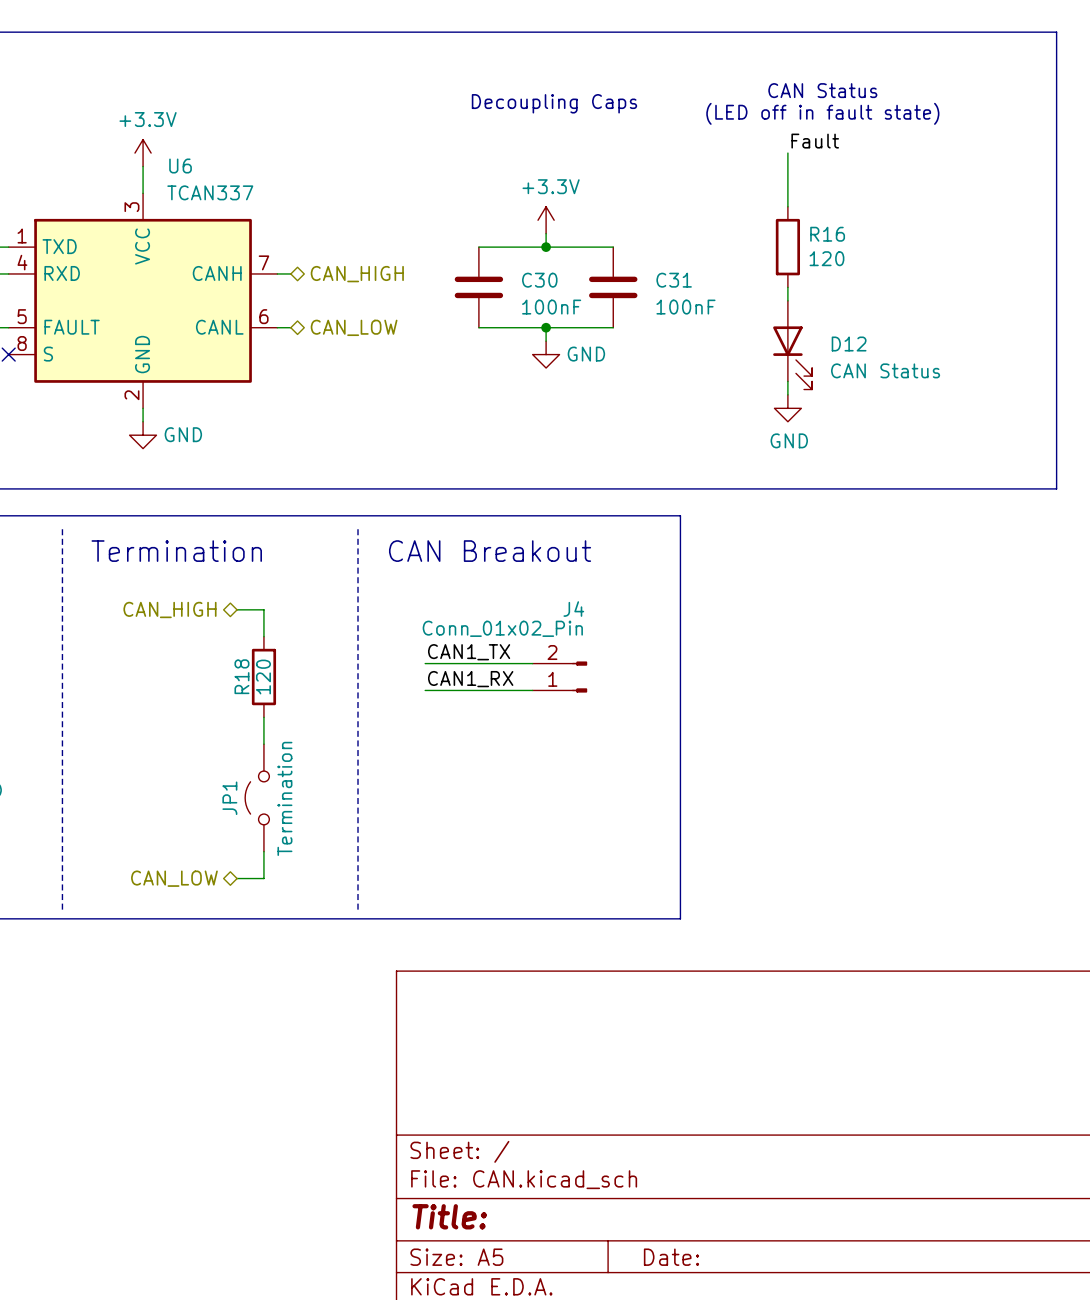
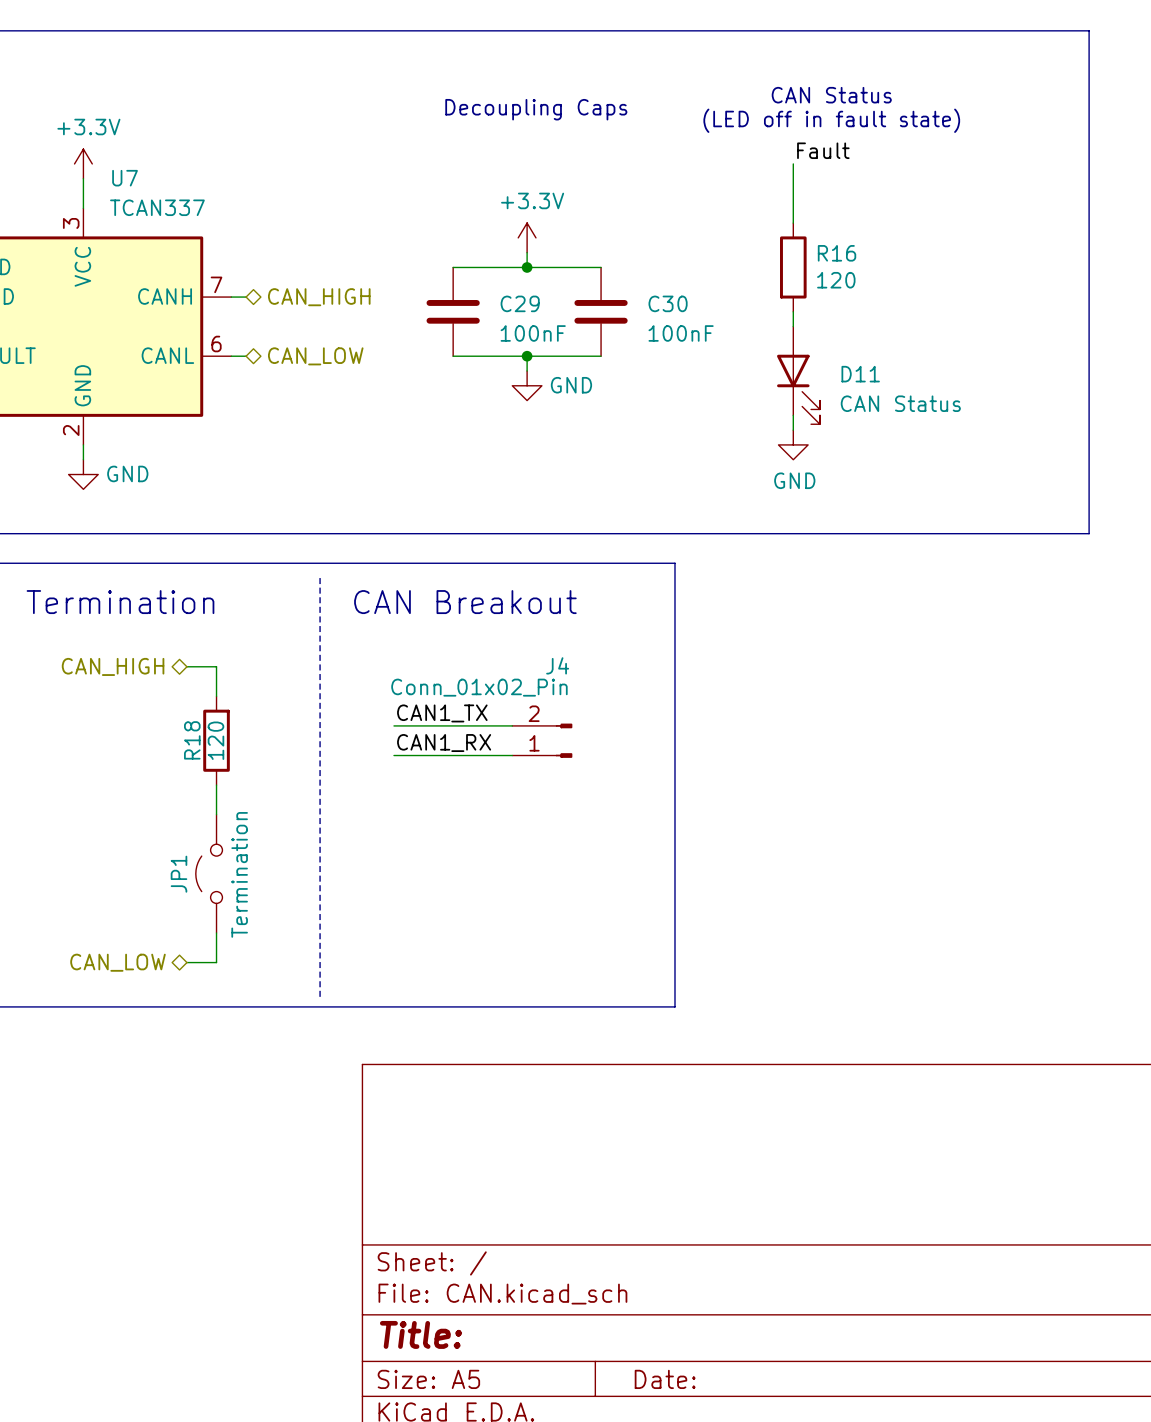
U6 name: U6 (180, 166) -> U7 (125, 178)
C30 name: C30 (539, 280) -> C29 (520, 303)
C31 name: C31 (674, 280) -> C30 (668, 303)
D12 name: D12 (849, 344) -> D11 (860, 374)

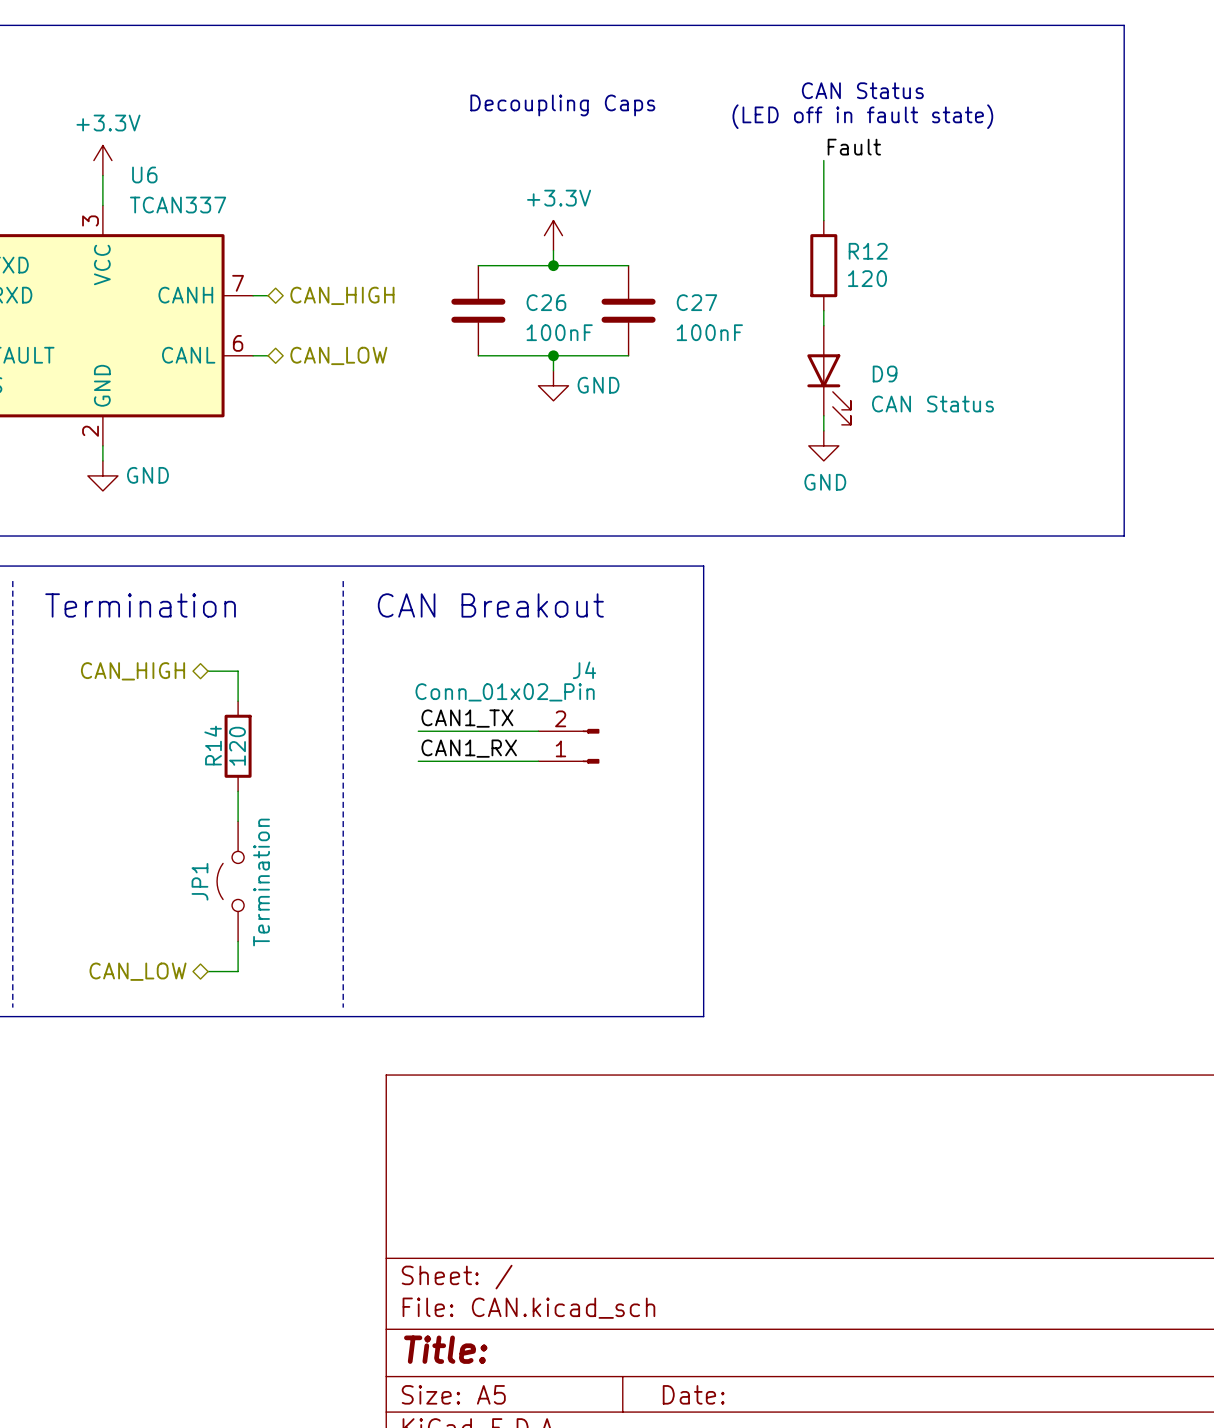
U7 name: U7 (125, 178) -> U6 (144, 174)
R16 name: R16 (837, 253) -> R12 (868, 251)
C29 name: C29 (520, 303) -> C26 (546, 302)
C30 name: C30 (668, 303) -> C27 (696, 302)
D11 name: D11 (860, 374) -> D9 (885, 373)
R18 name: R18 (192, 740) -> R14 (213, 745)

